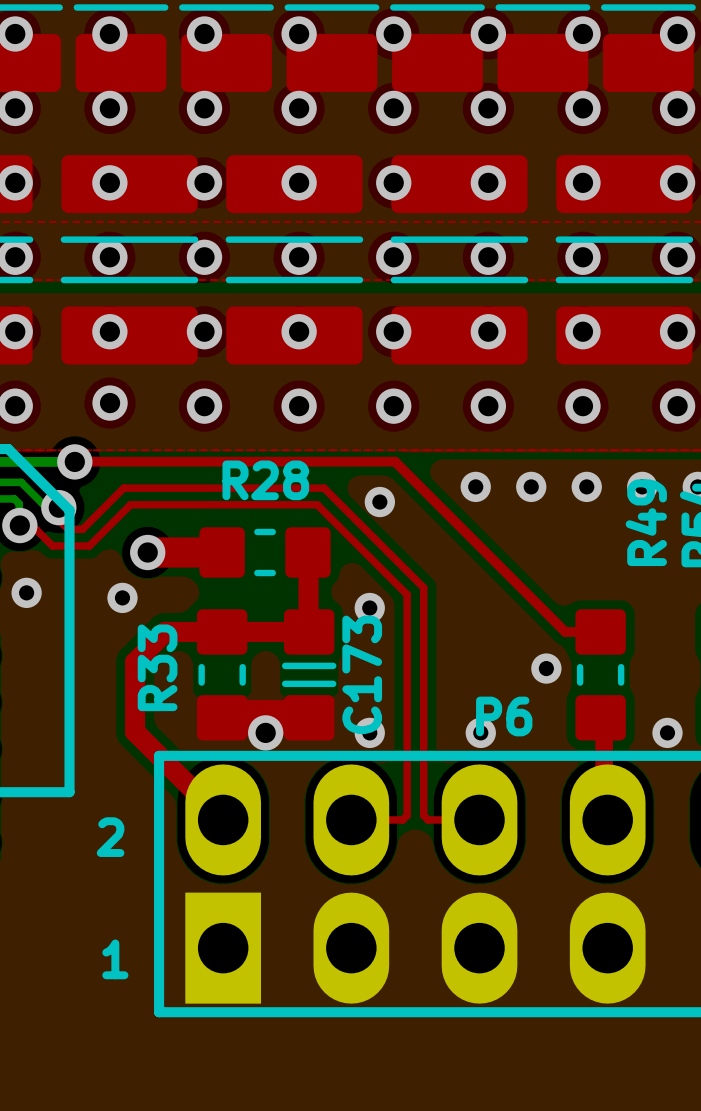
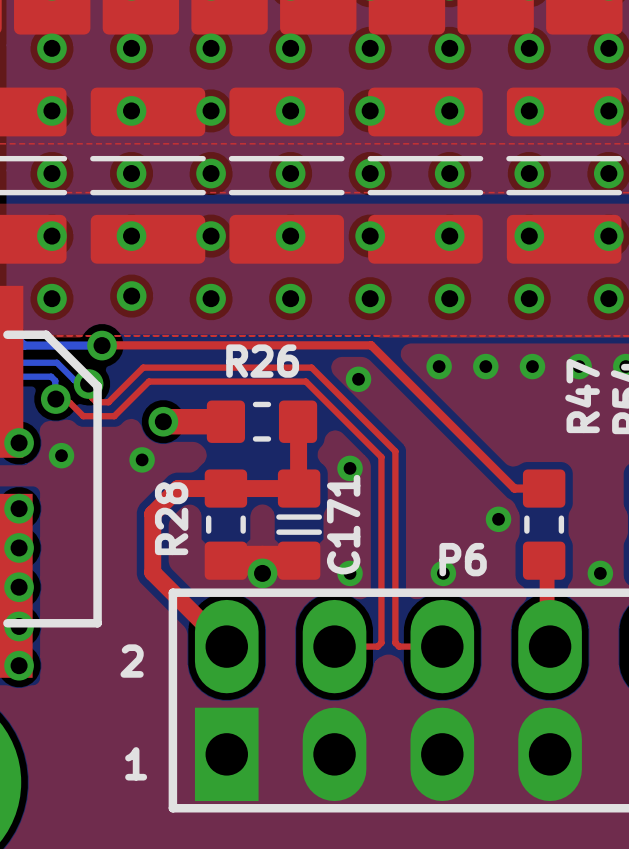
R28 name: R28 (265, 480) -> R26 (262, 361)
R49 name: R49 (646, 522) -> R47 (582, 396)
R33 name: R33 (157, 667) -> R28 (171, 518)
C173 name: C173 (362, 674) -> C171 (343, 524)

